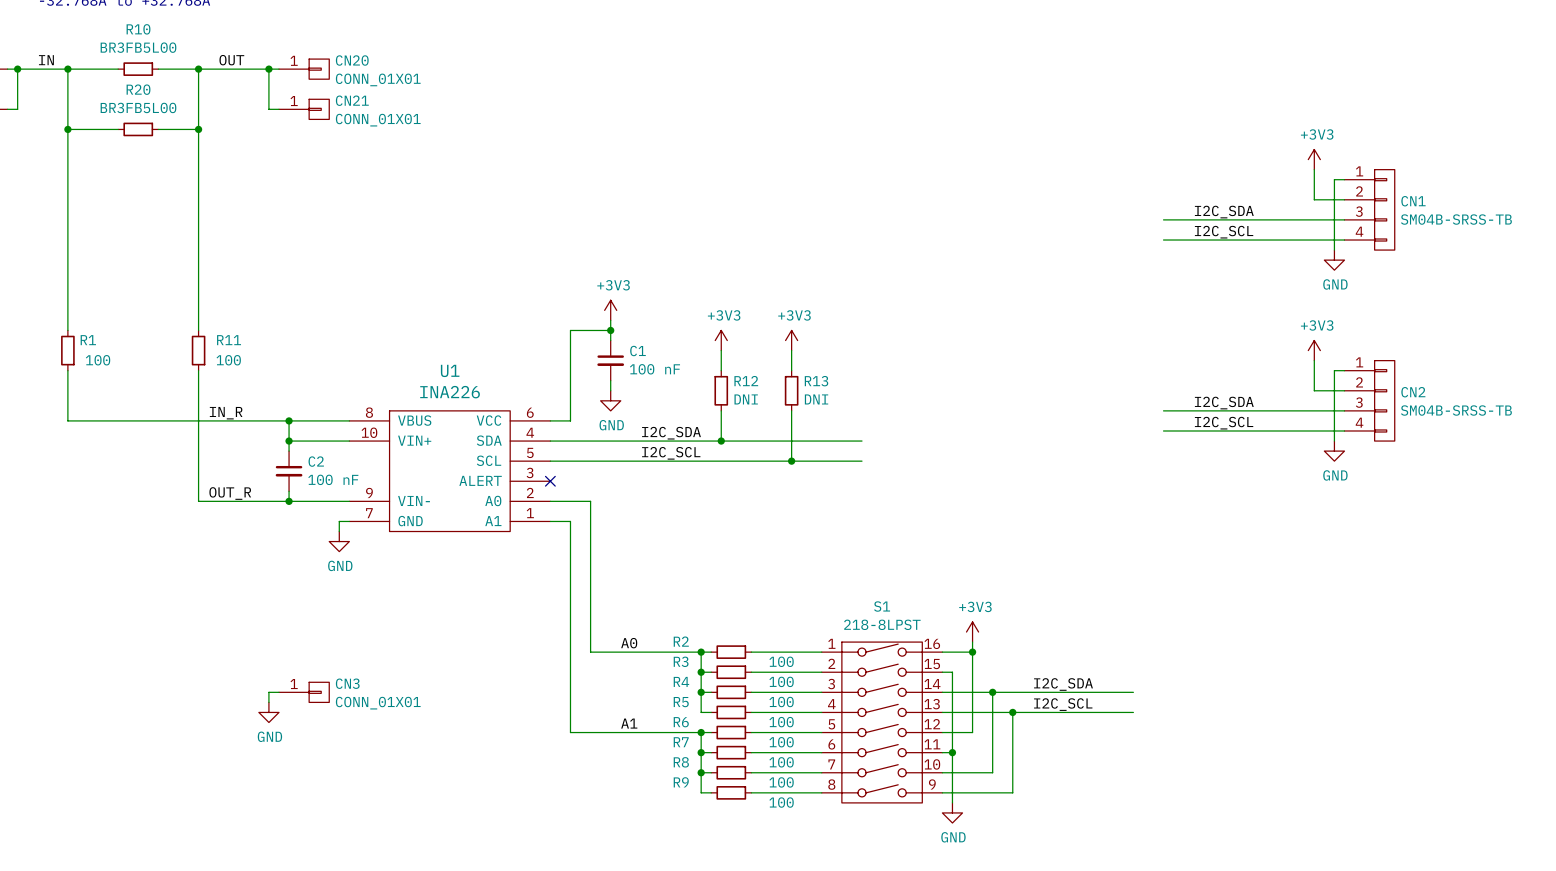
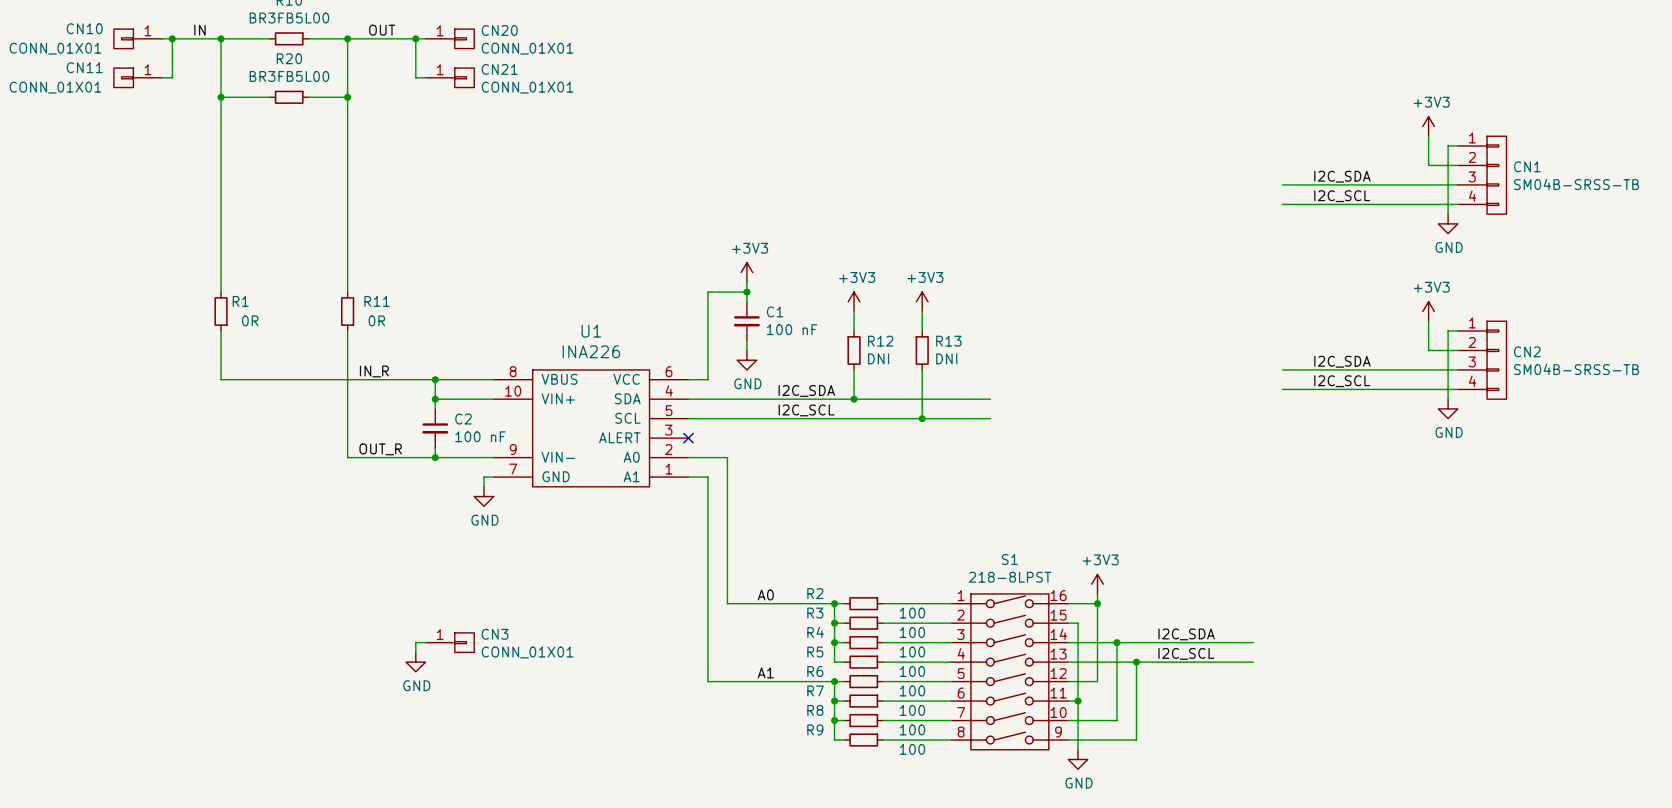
R1 value: 100 (98, 360) -> 0R (250, 320)
R11 value: 100 (228, 360) -> 0R (376, 320)

